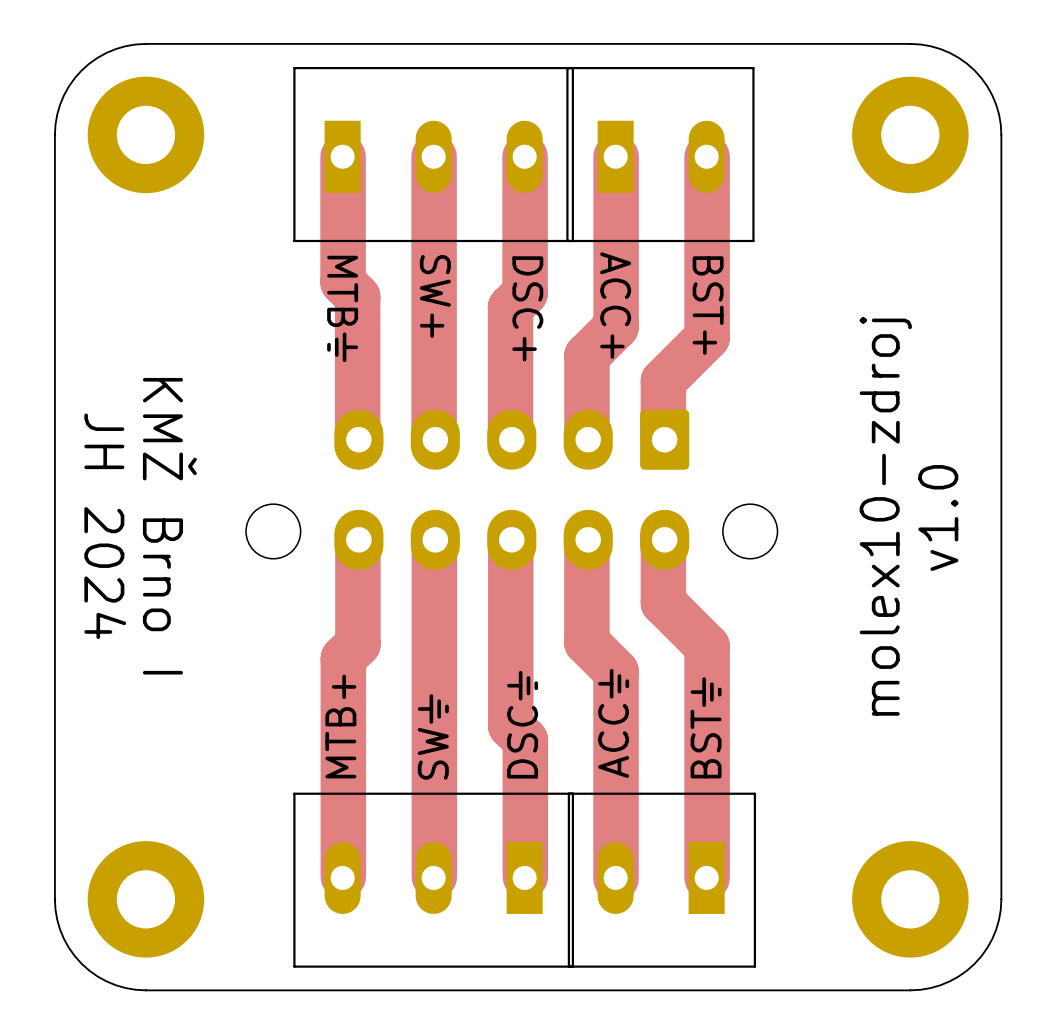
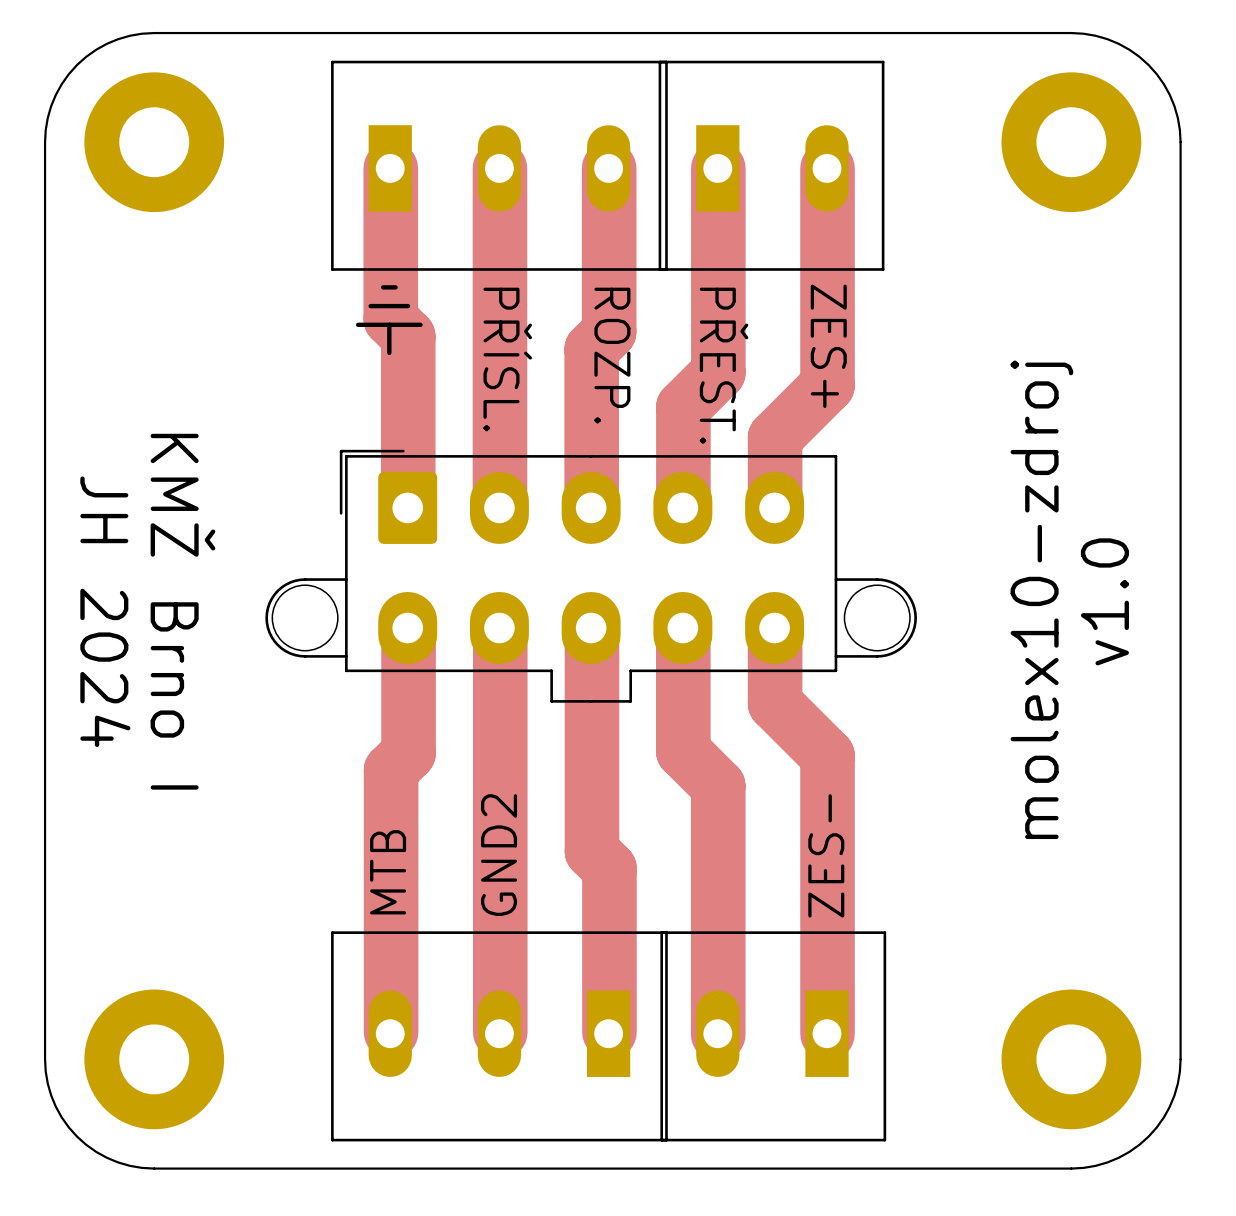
text: SW+ (435, 296) -> PŘÍSL. (507, 359)
text: ACC+ (615, 305) -> PŘEST. (724, 365)
text: BST+ (708, 305) -> ZES+ (828, 346)
text: MTB⏚ (342, 308) -> ⏚ (389, 320)
text: DSC+ (527, 308) -> ROZP. (612, 355)
part side: bottom (511, 489) -> top (591, 576)
text: ACC⏚ (613, 723) -> none
text: DSC⏚ (522, 724) -> none
text: MTB+ (340, 726) -> MTB (388, 872)
text: BST⏚ (706, 727) -> ZES- (826, 855)
text: SW⏚ (433, 736) -> GND2 (499, 855)

